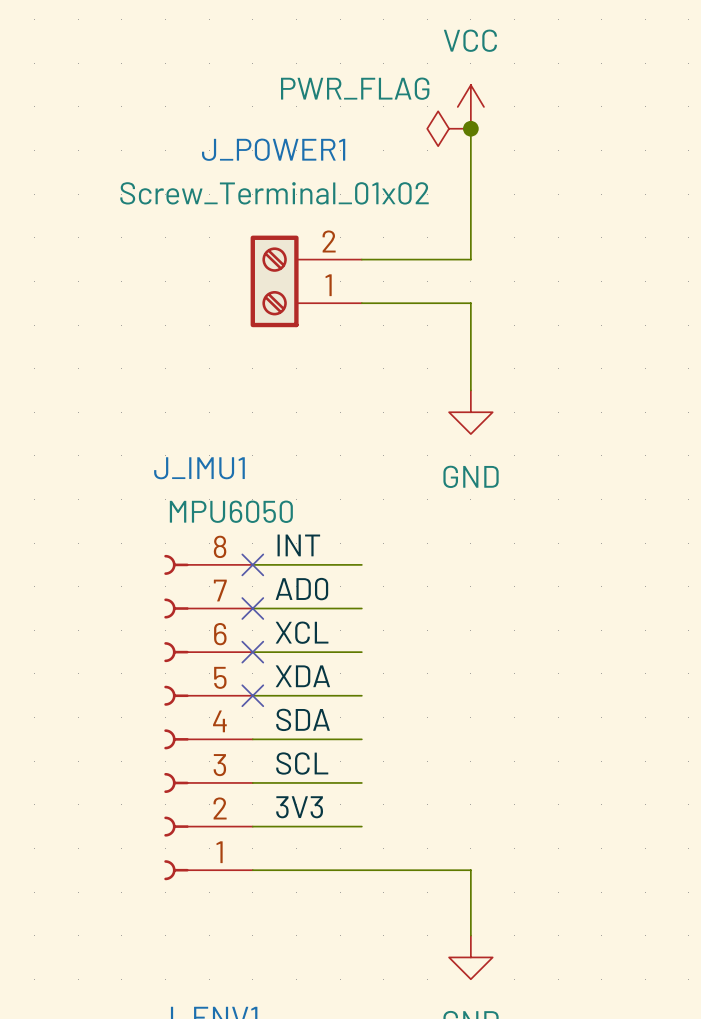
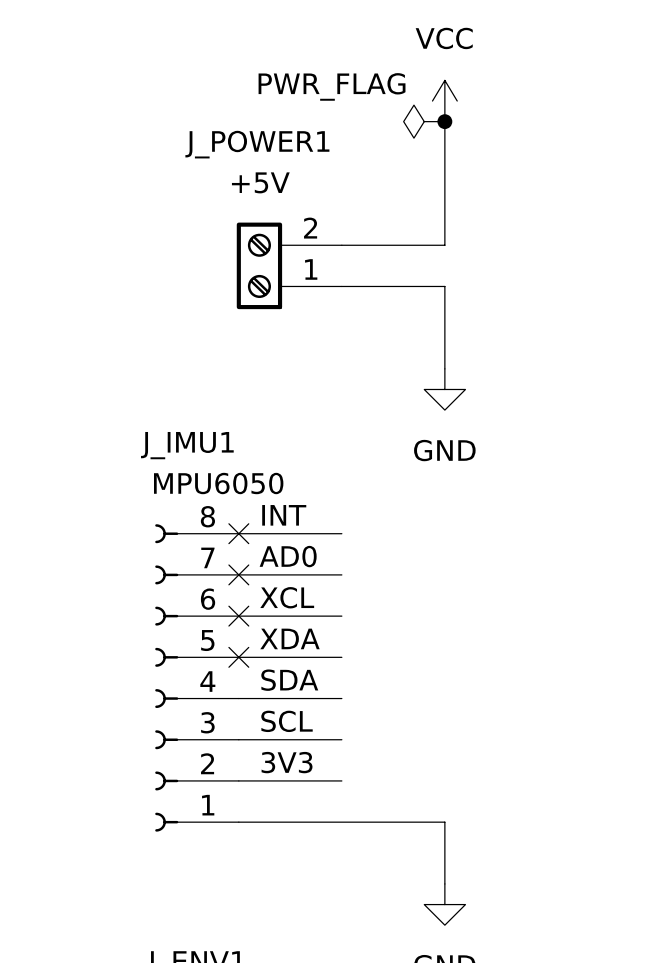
J_POWER1 value: Screw_Terminal_01x02 (274, 193) -> +5V (260, 182)

